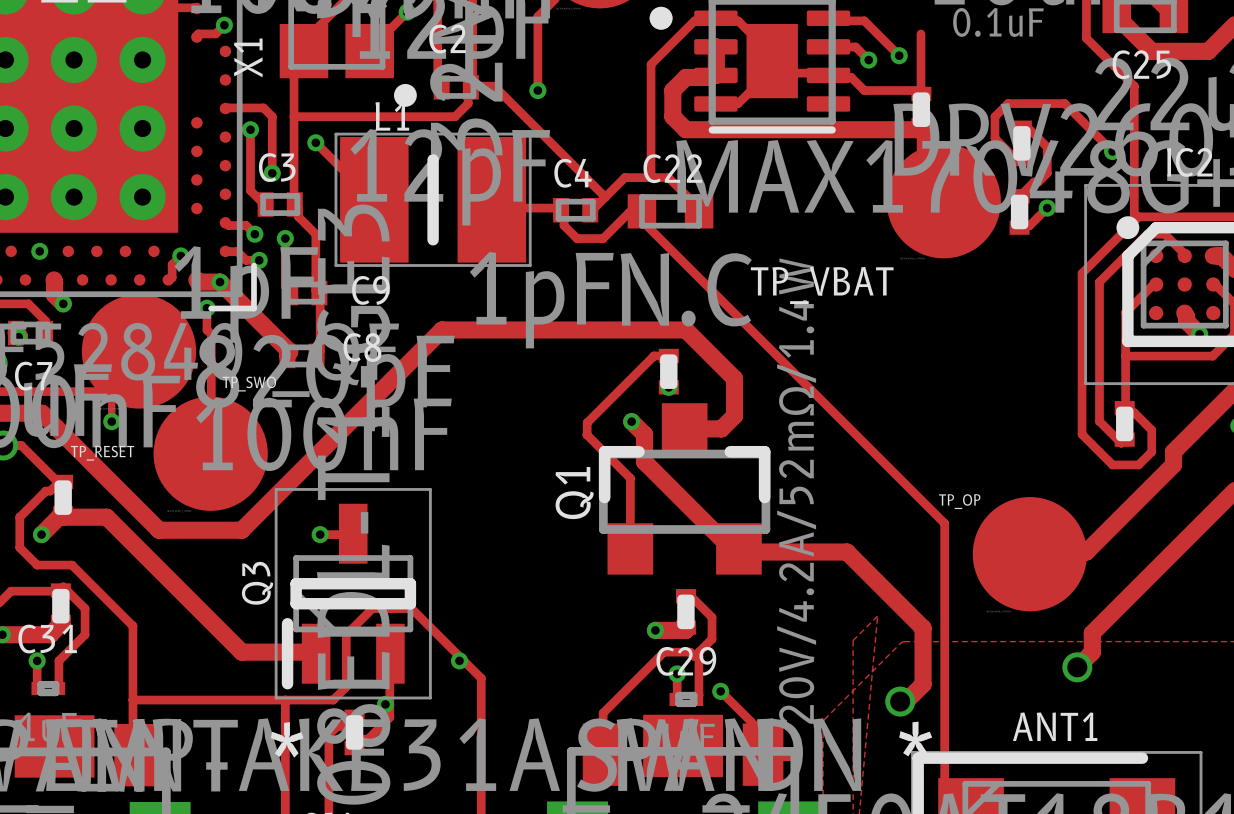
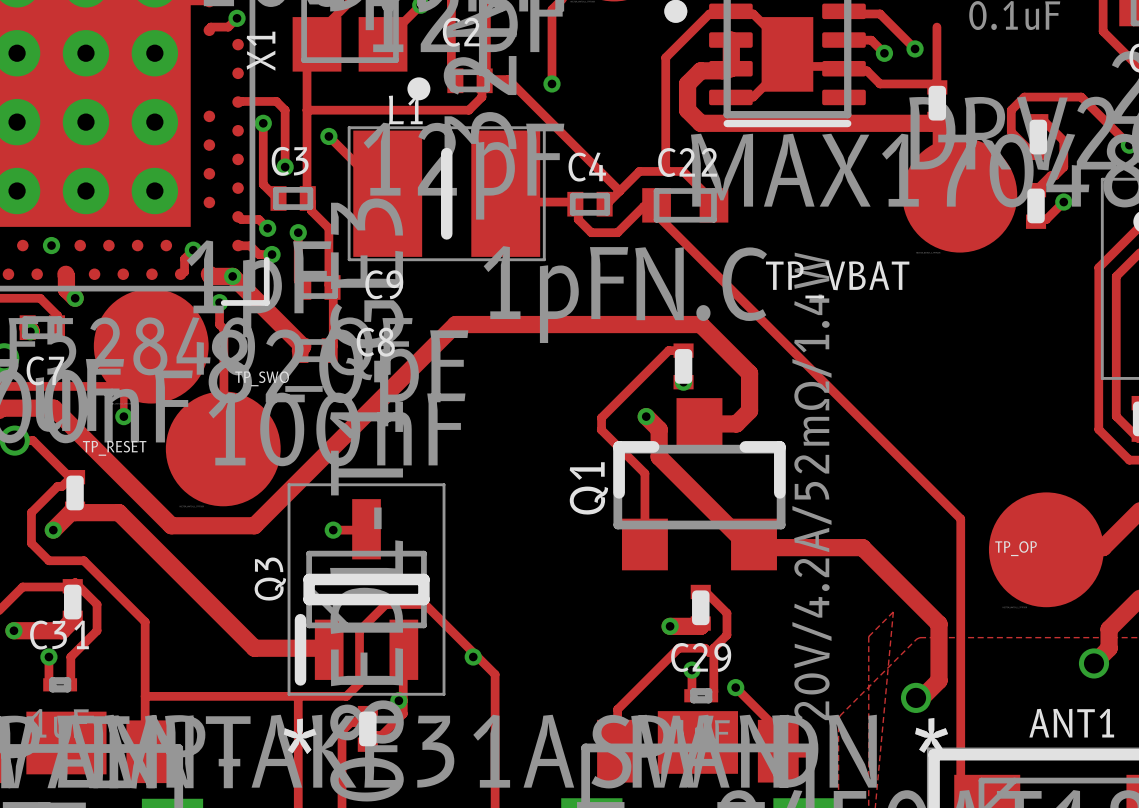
TP_OP name position: TP_OP (959, 501) -> TP_OP (1016, 548)

